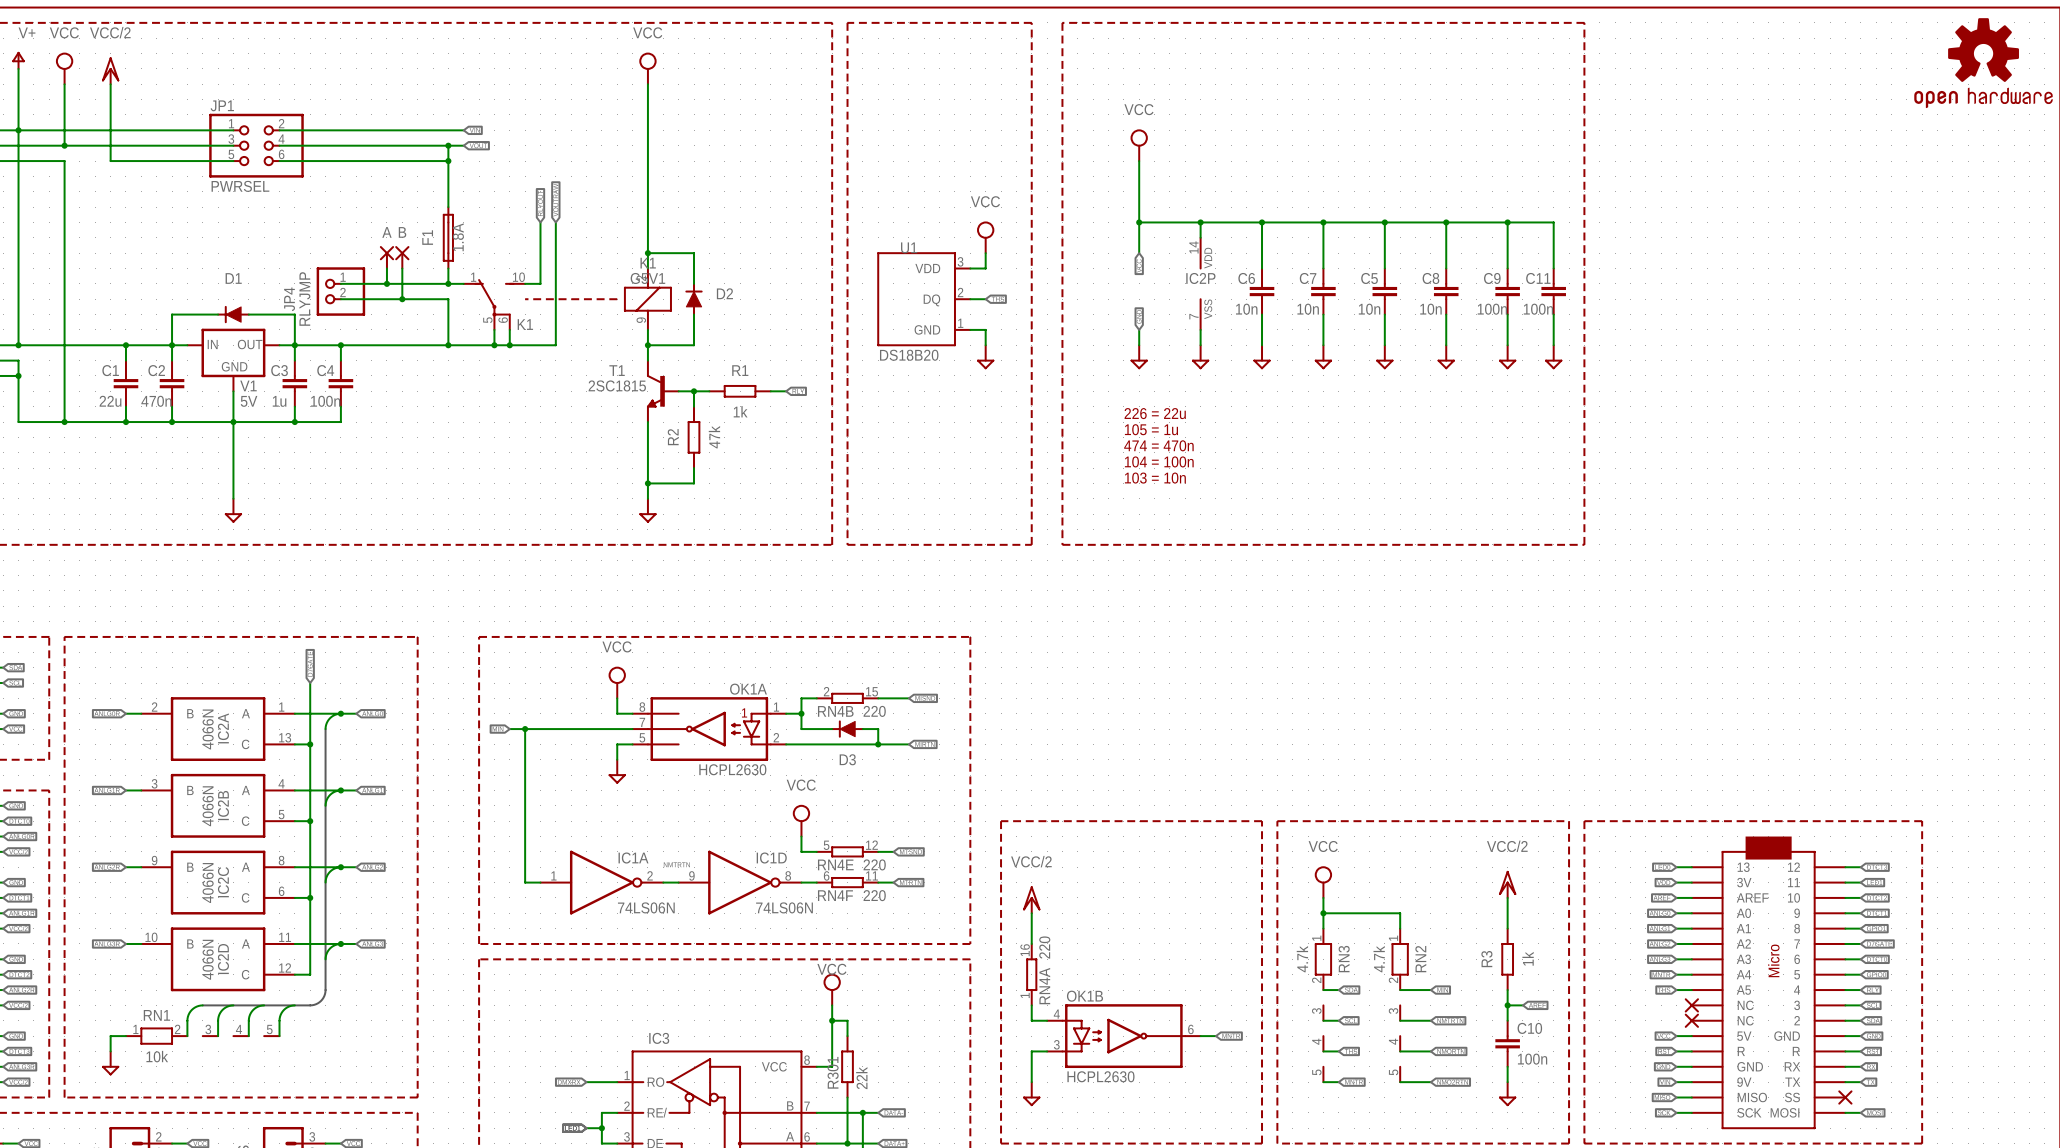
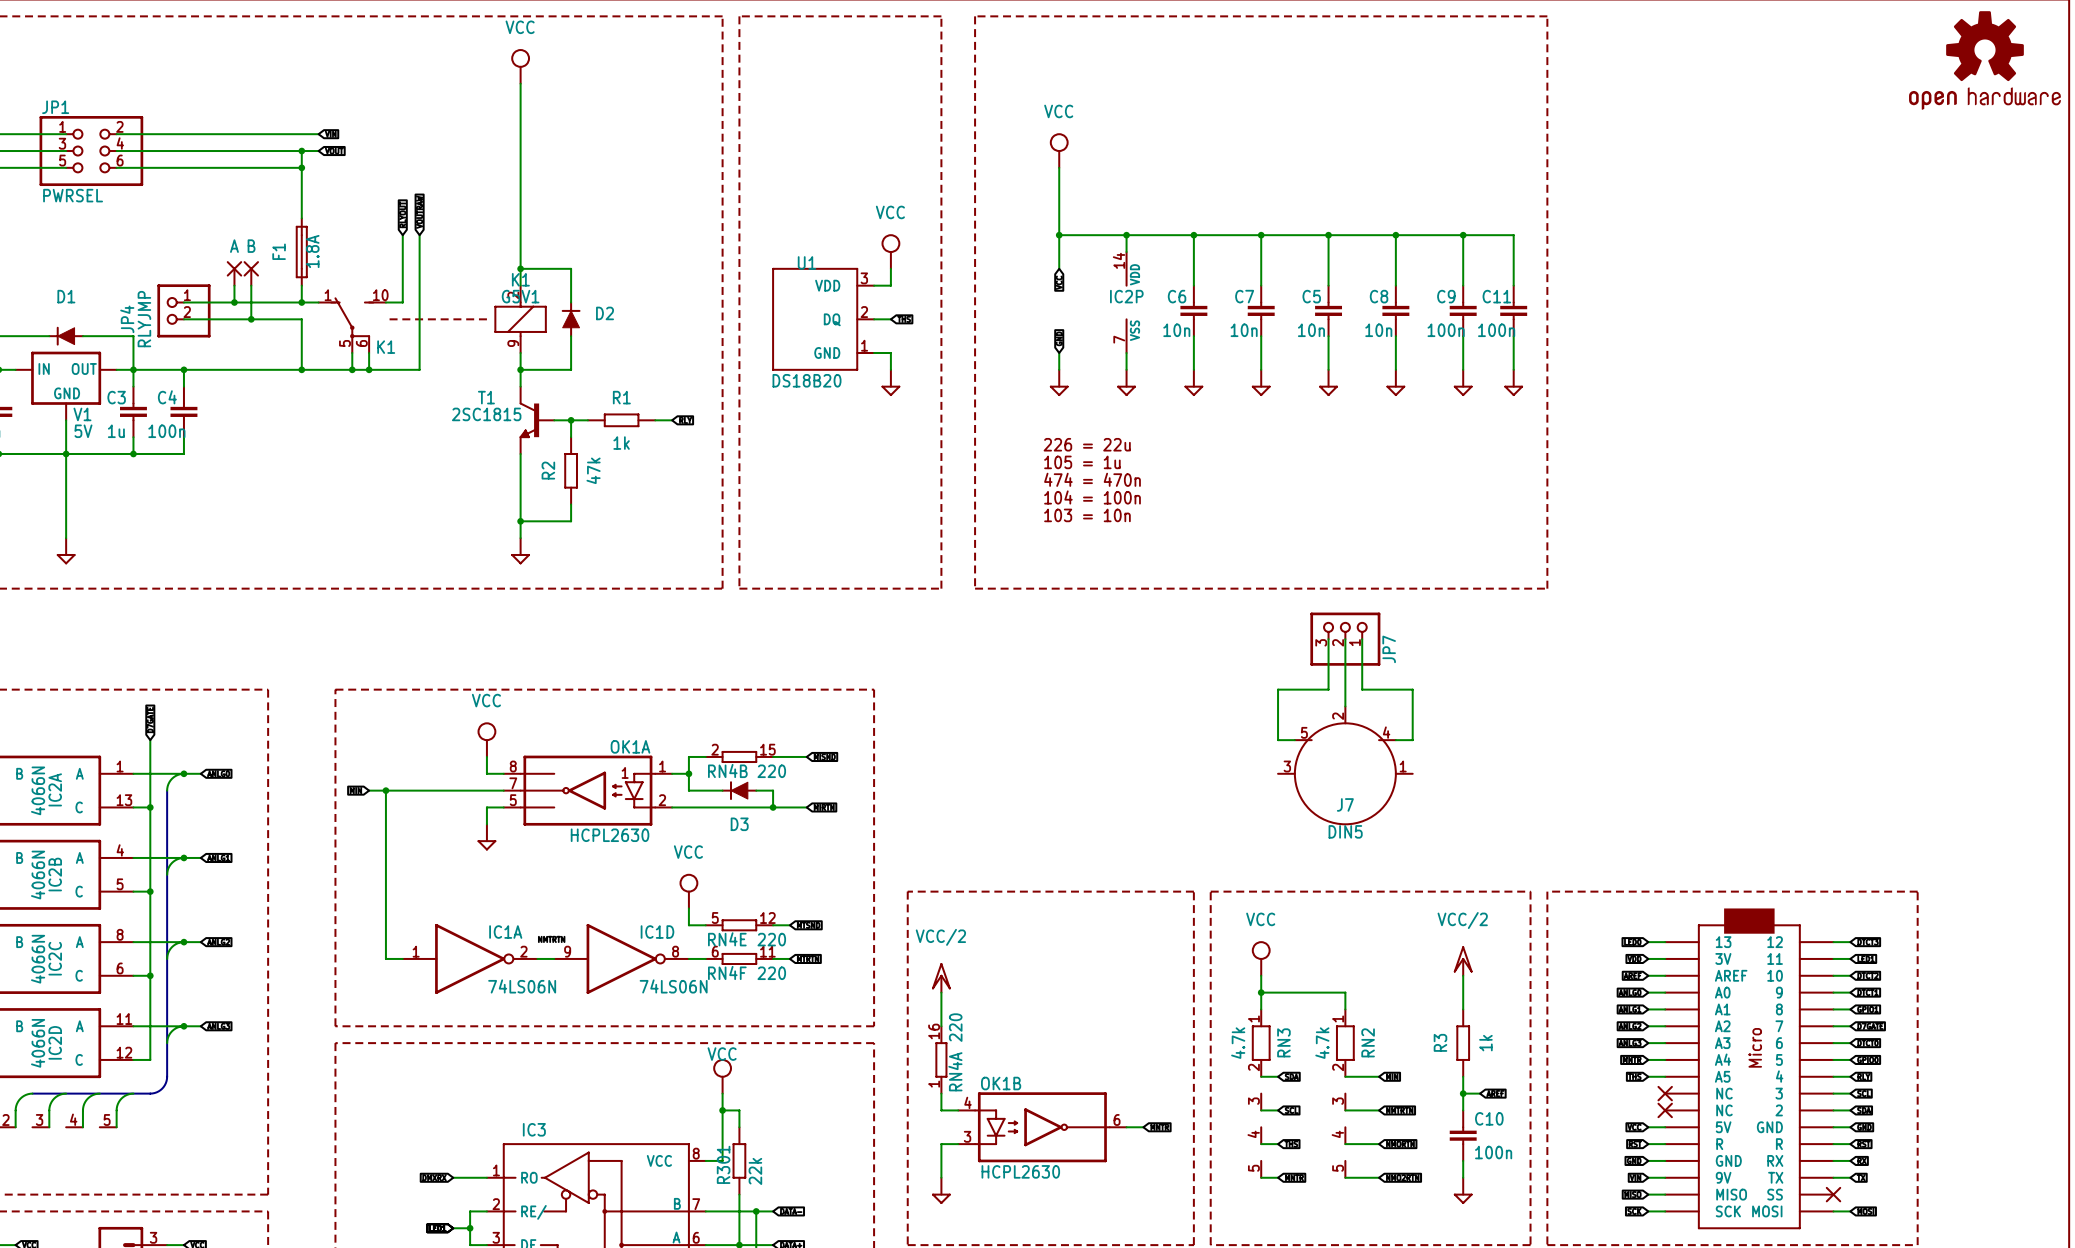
wire: none -> (1328, 639) (1328, 689) (1278, 689) (1278, 740) (1294, 740)
wire: none -> (1345, 639) (1345, 706)
JP7: none -> (1345, 639)
wire: none -> (1362, 639) (1362, 689) (1412, 689) (1412, 740) (1395, 740)
J7: none -> DIN5 (1345, 765)

